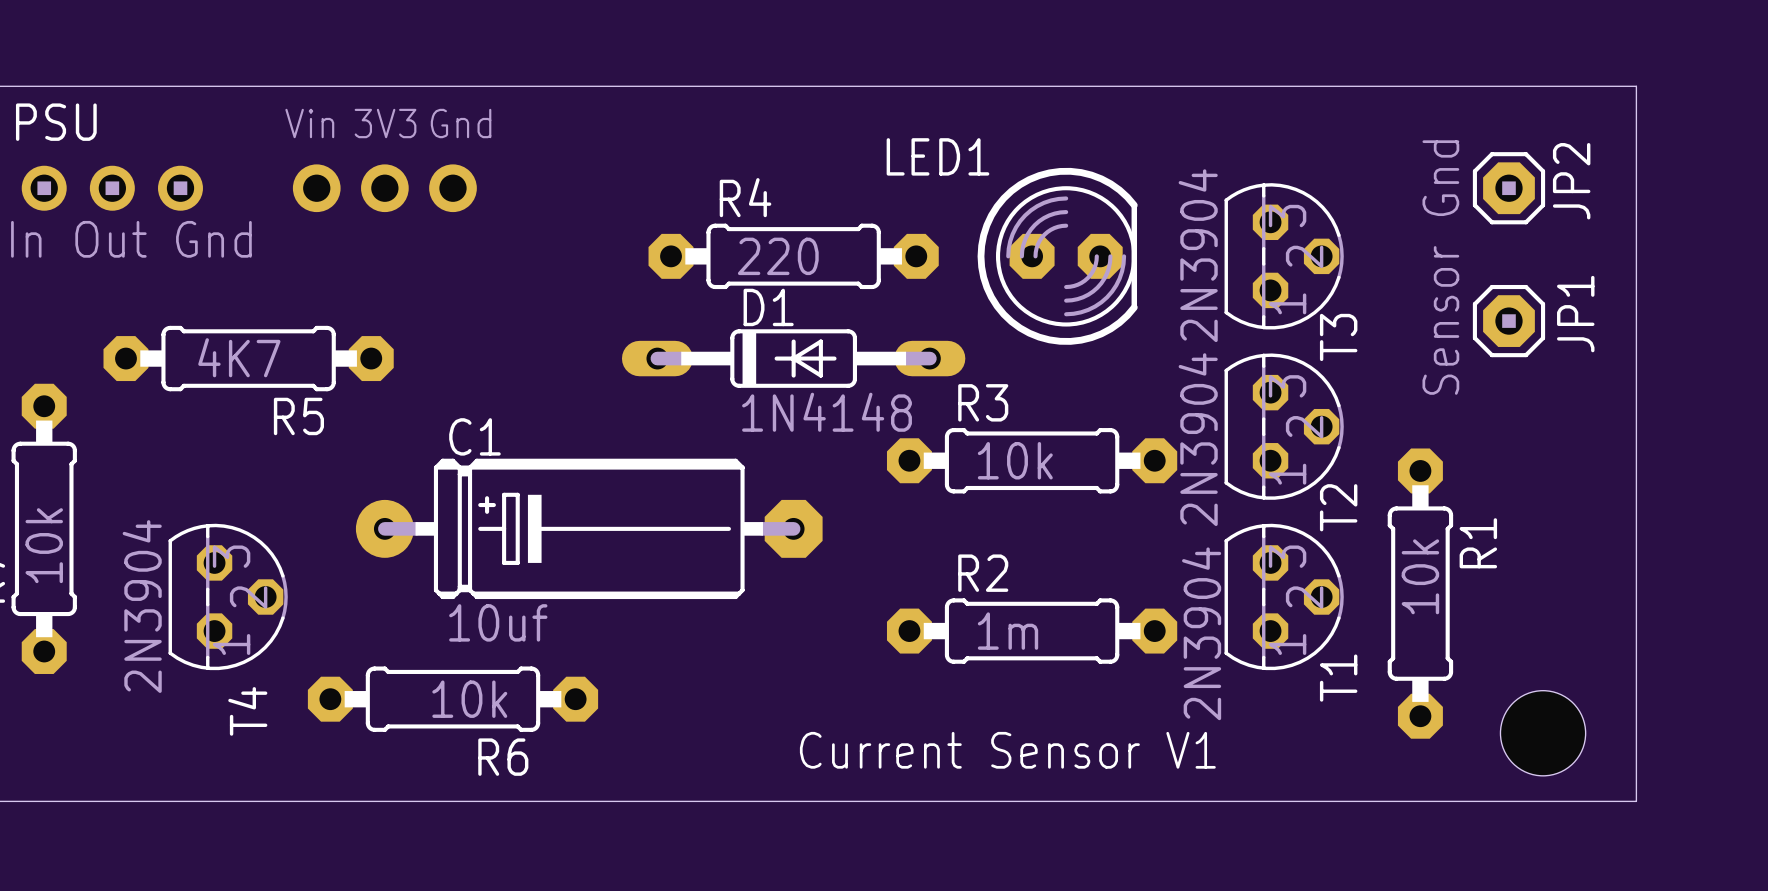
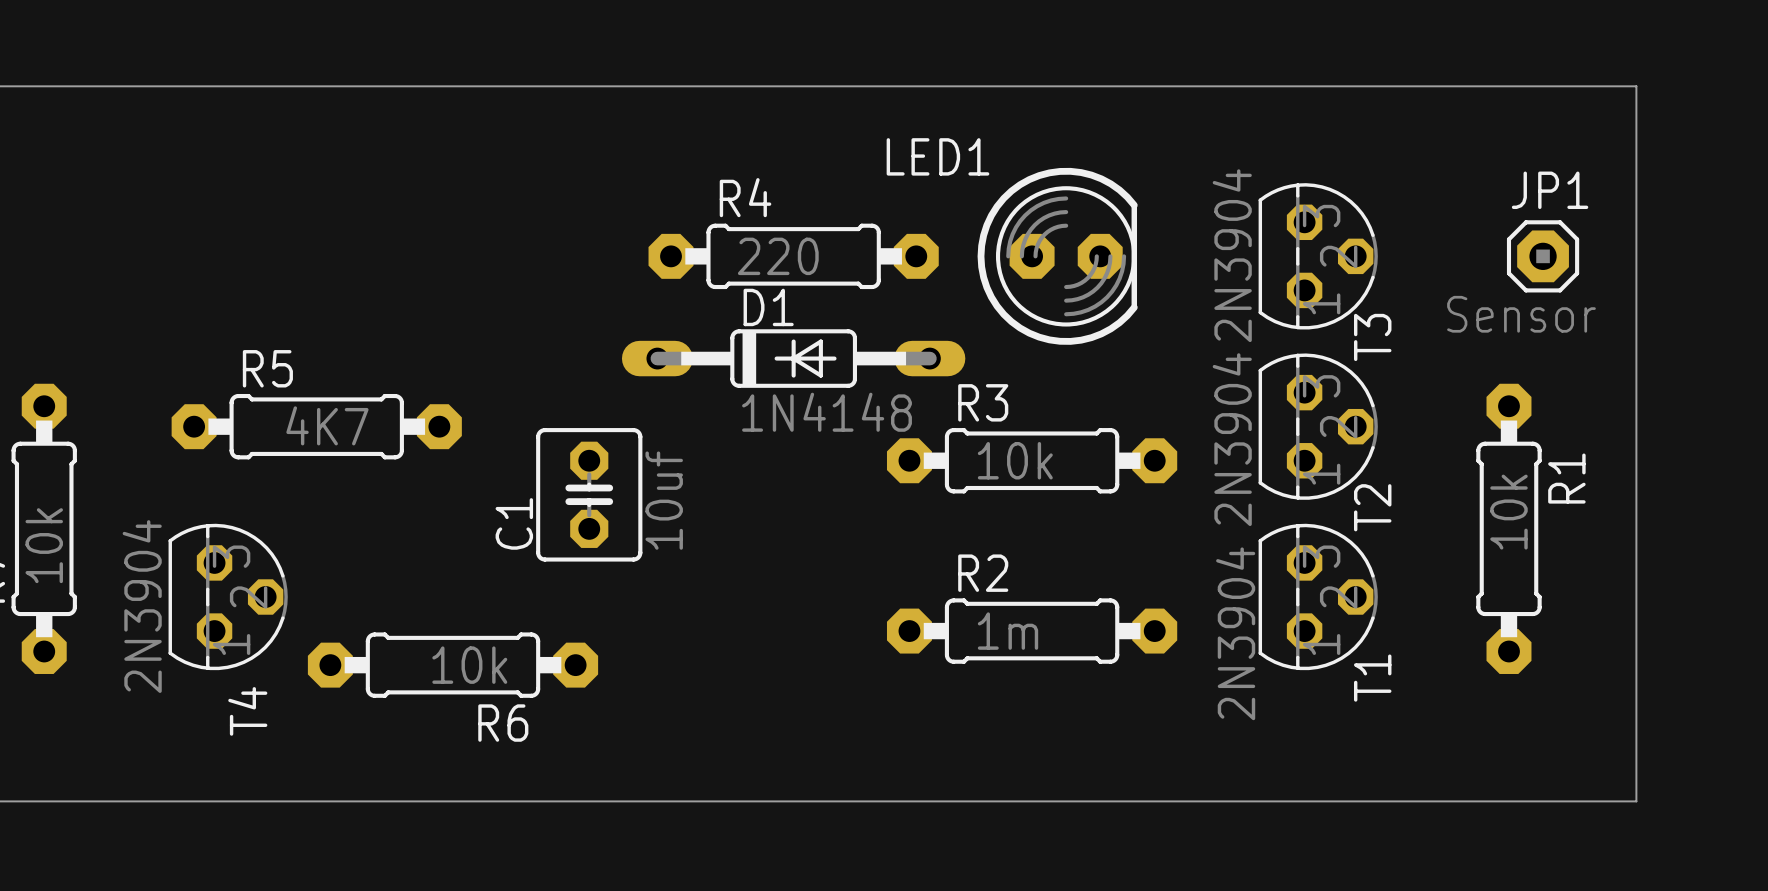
PSU: In Out Gnd (112, 188) -> none
part: Vin (316, 188) -> none
part: 3V3 (384, 188) -> none
part: Gnd (453, 188) -> none
JP2: Gnd (1508, 188) -> none
T3 position: (1284, 256) -> (1318, 256)
JP1 name rotation: 0° (1575, 314) -> 90° clockwise (1550, 190)
JP1 value rotation: 0° (1440, 320) -> 90° clockwise (1521, 314)
JP1 position: (1508, 321) -> (1543, 256)
R5 value position: 4K7 (239, 357) -> 4K7 (327, 425)
R5 position: (248, 358) -> (316, 426)
R5 name position: R5 (298, 416) -> R5 (267, 368)
T2 position: (1284, 426) -> (1318, 426)
C1 name position: C1 (474, 436) -> C1 (514, 523)
C1 footprint: [355, 458, 823, 600] -> [536, 428, 643, 562]
R1 position: (1420, 593) -> (1508, 528)
T1 position: (1284, 596) -> (1318, 596)
C1 value position: 10uf (498, 622) -> 10uf (664, 500)
R6 position: (453, 699) -> (453, 665)
hole: (1543, 733) -> none
text: Current Sensor V1 (1007, 750) -> none

